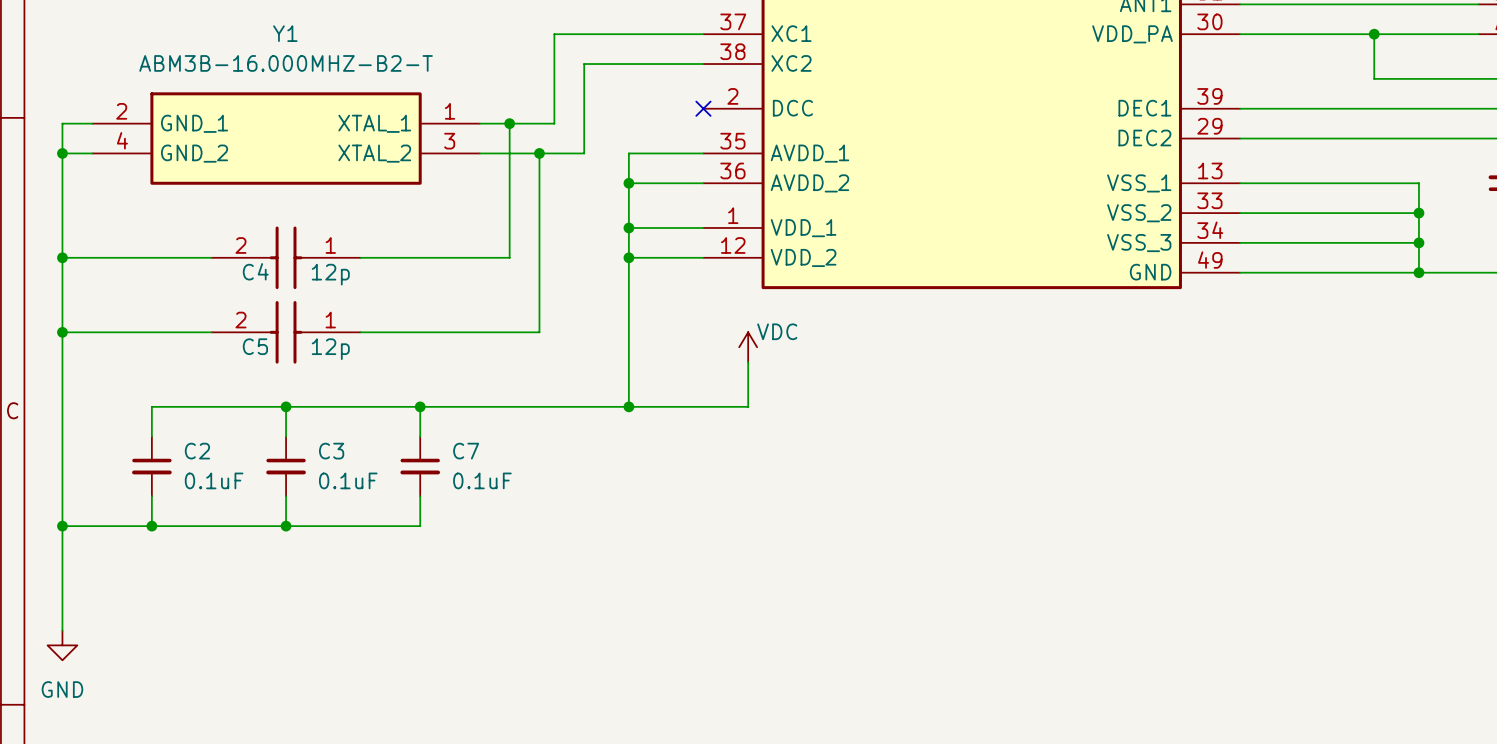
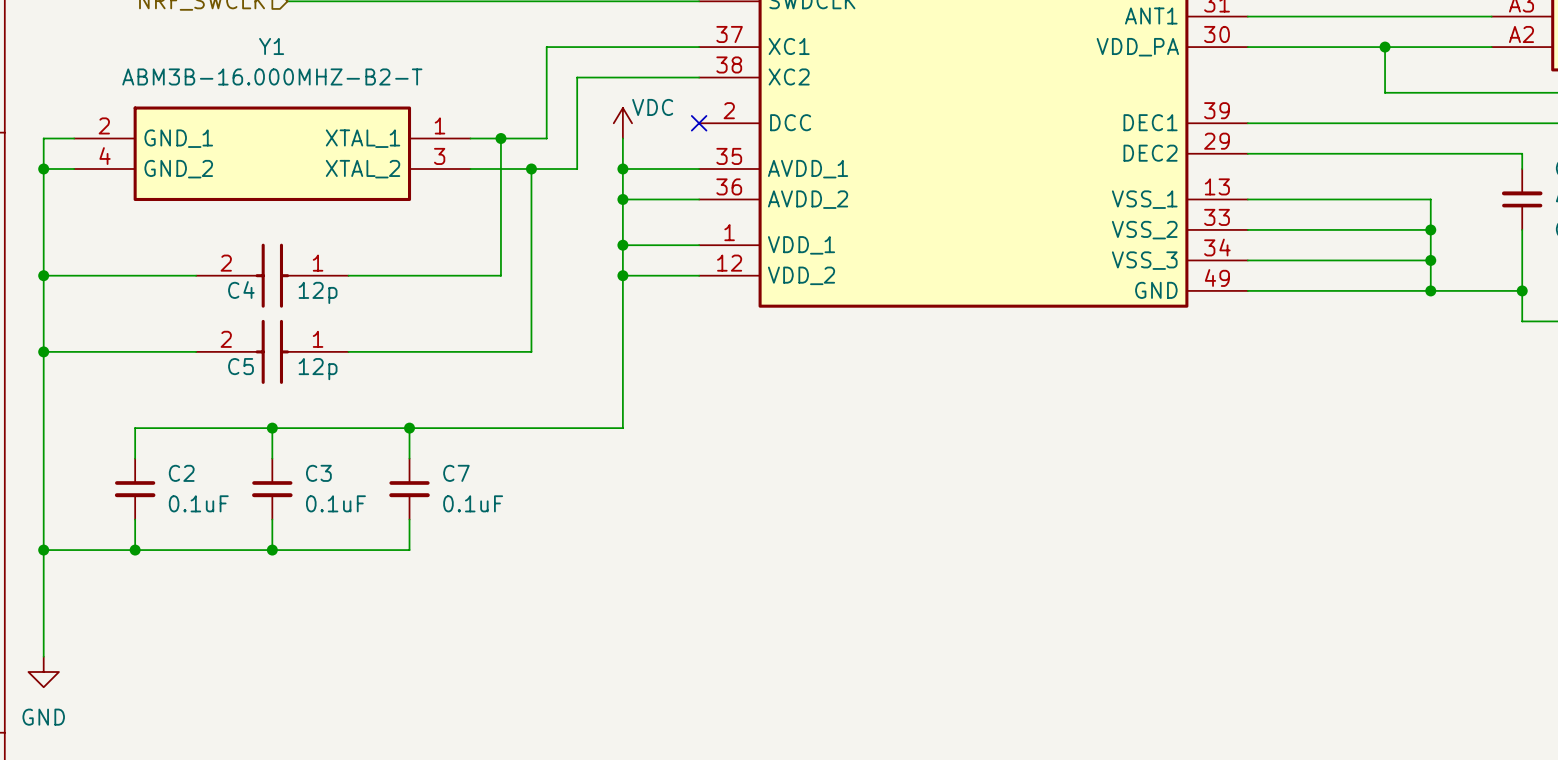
wire: none -> (622, 138) (622, 168)
junction: none -> (622, 168)
power symbol position: VDC (748, 347) -> VDC (622, 123)
wire: (748, 362) (748, 406) (628, 406) -> none
junction: (628, 406) -> none

